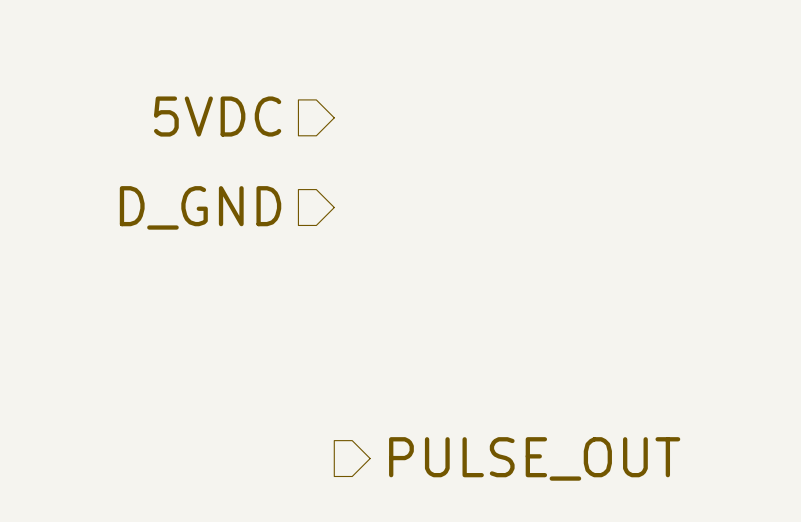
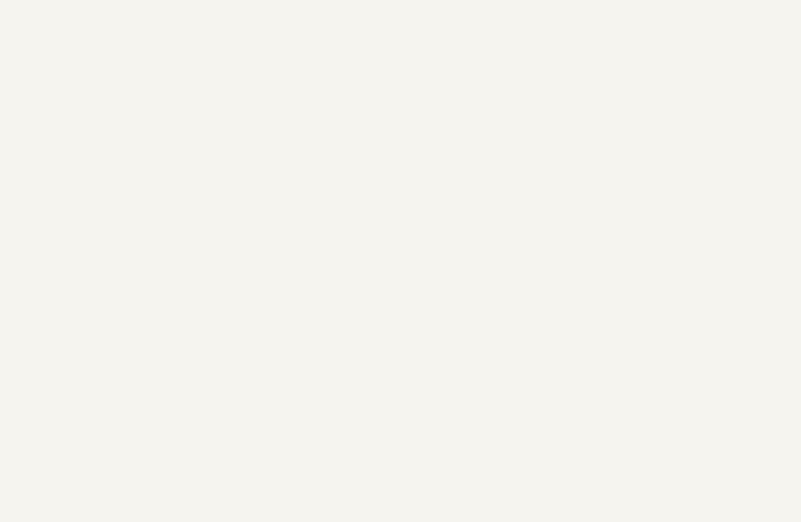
hierarchical label: 5VDC (217, 116) -> none
hierarchical label: D_GND (200, 207) -> none
hierarchical label: PULSE_OUT (534, 458) -> none

